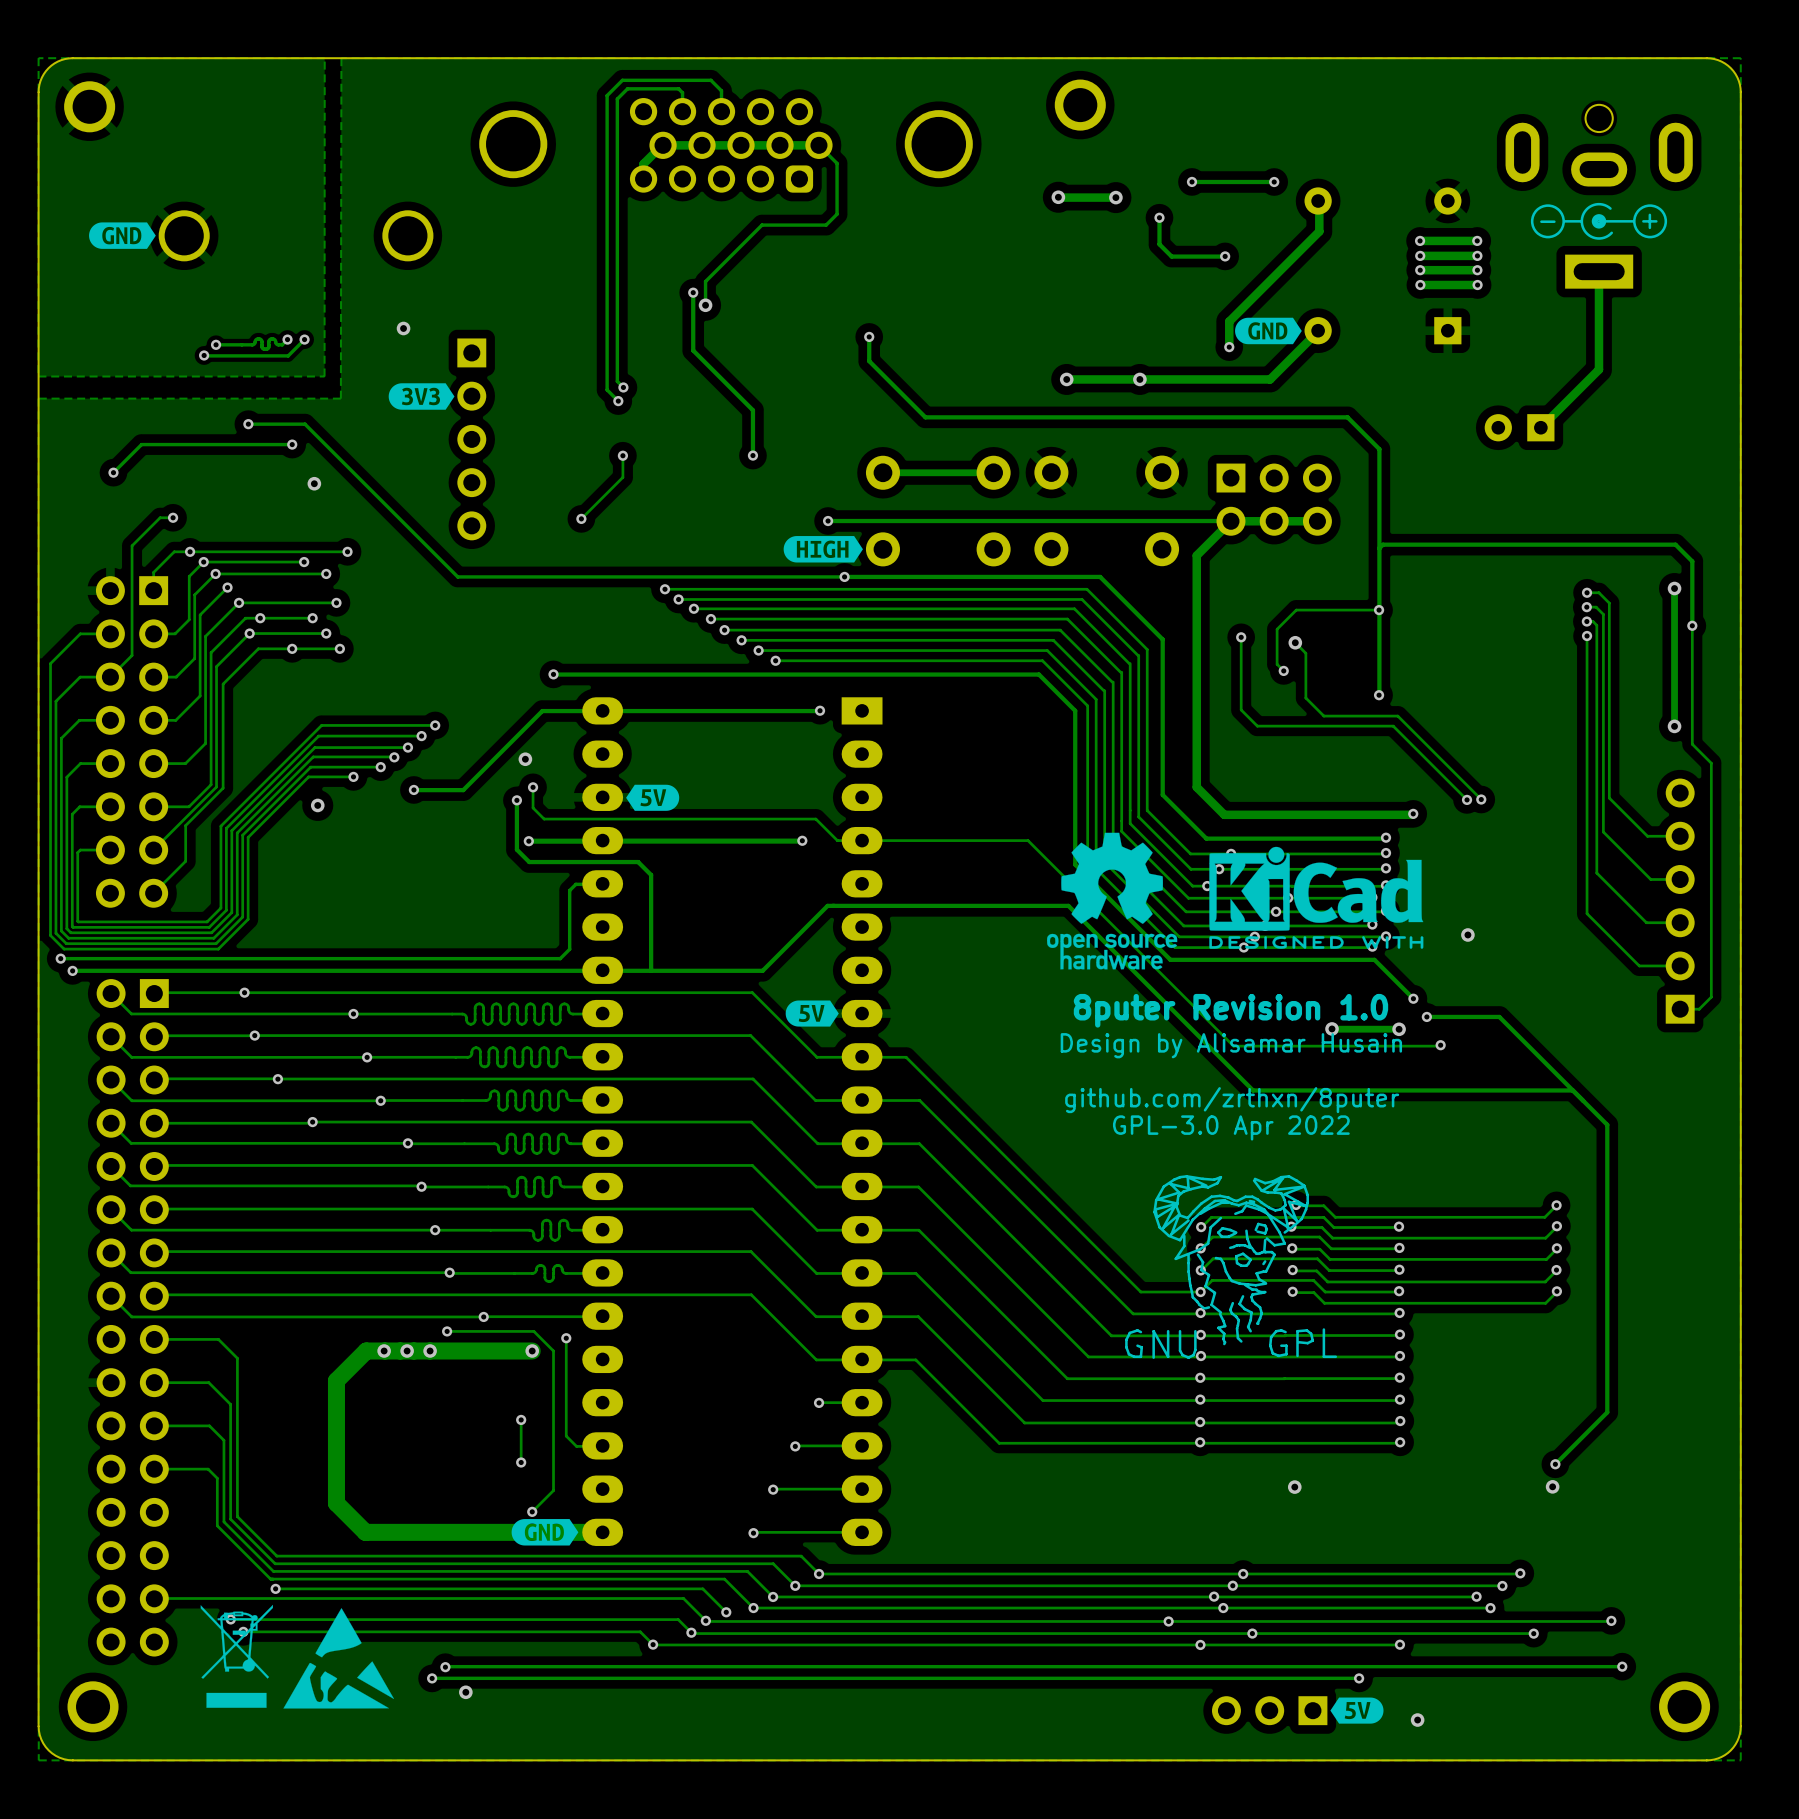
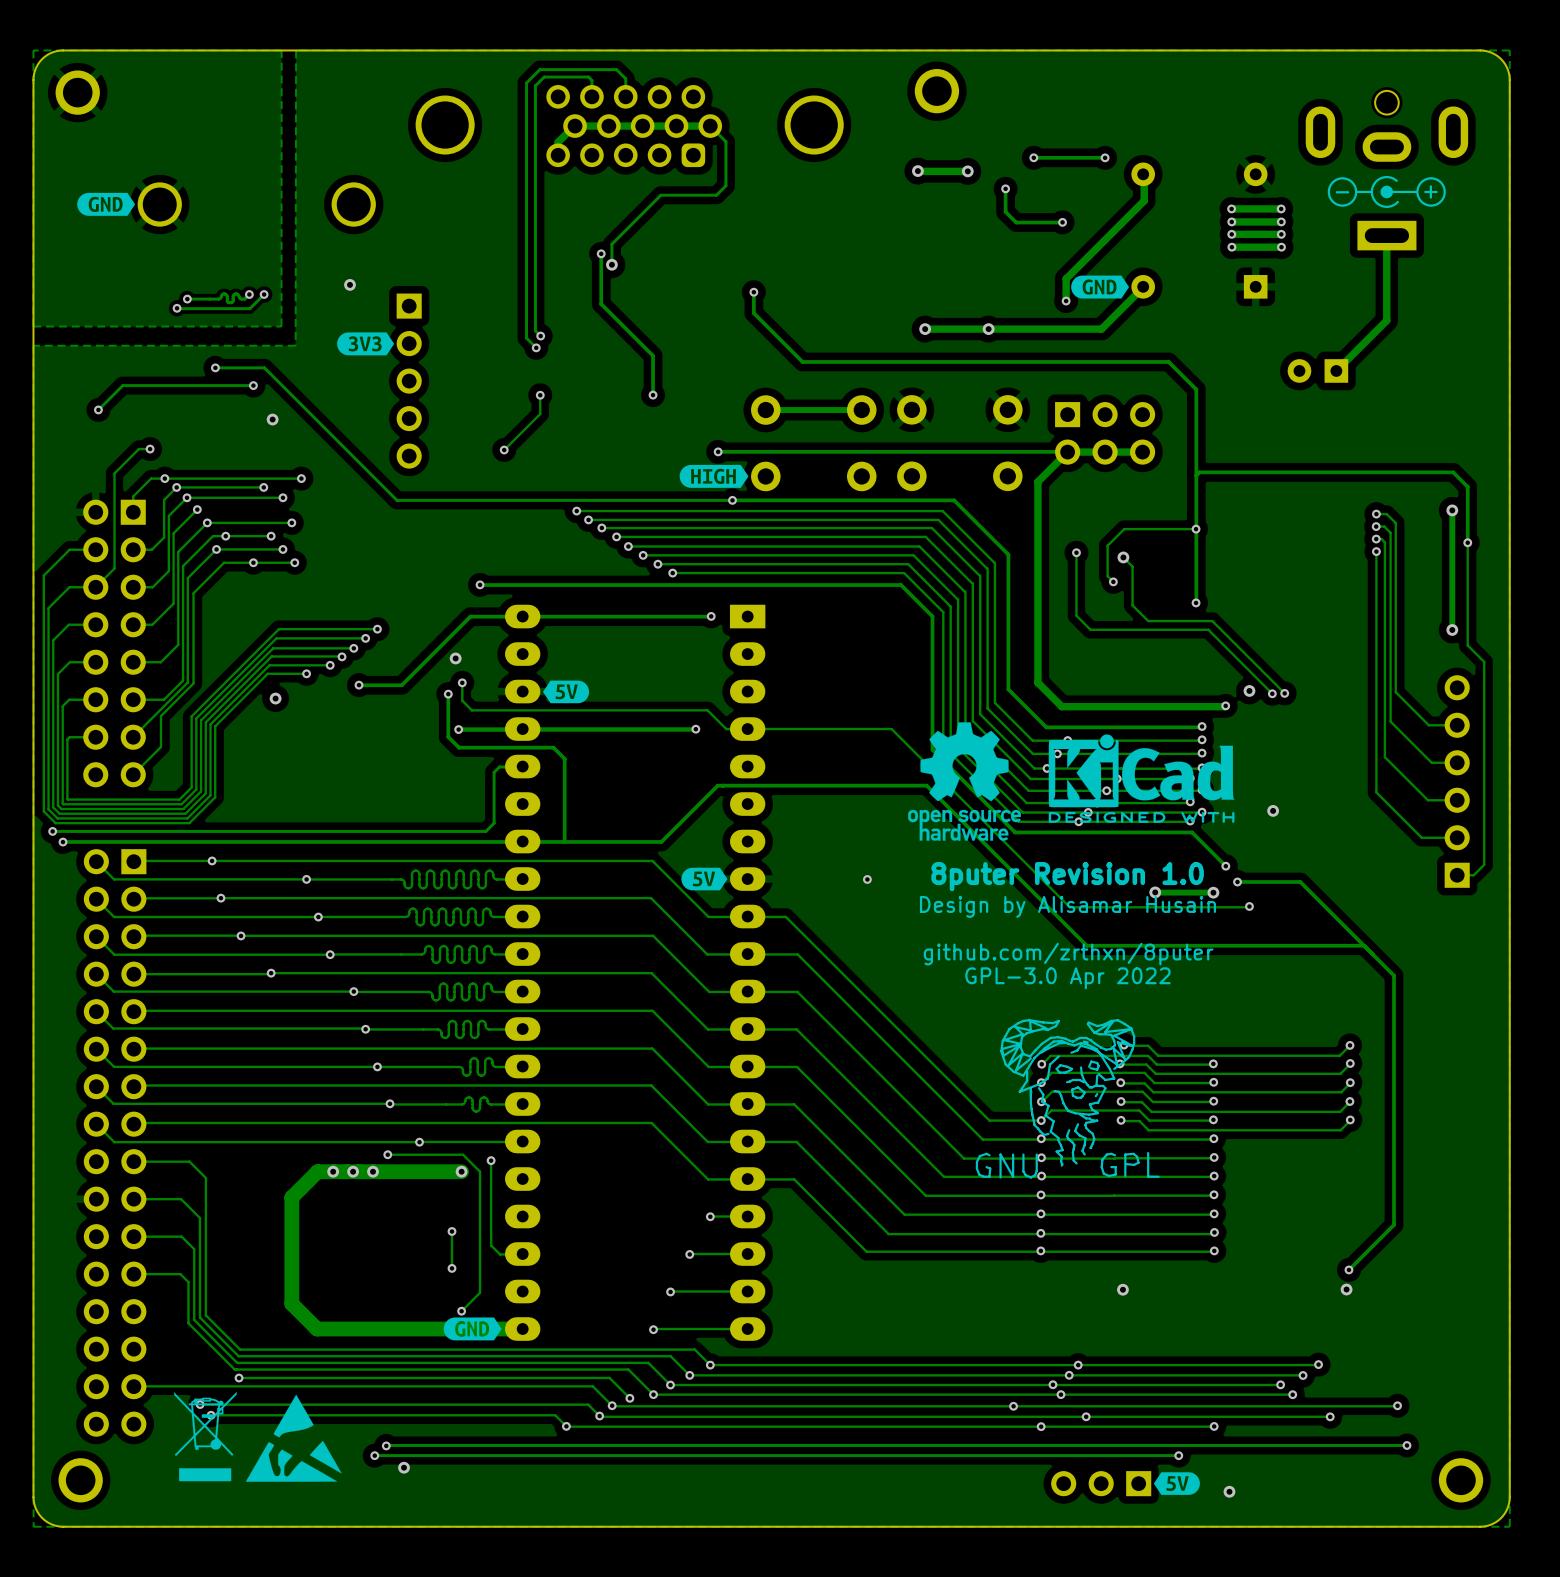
via: none -> (1249, 690)
via: none -> (867, 879)

